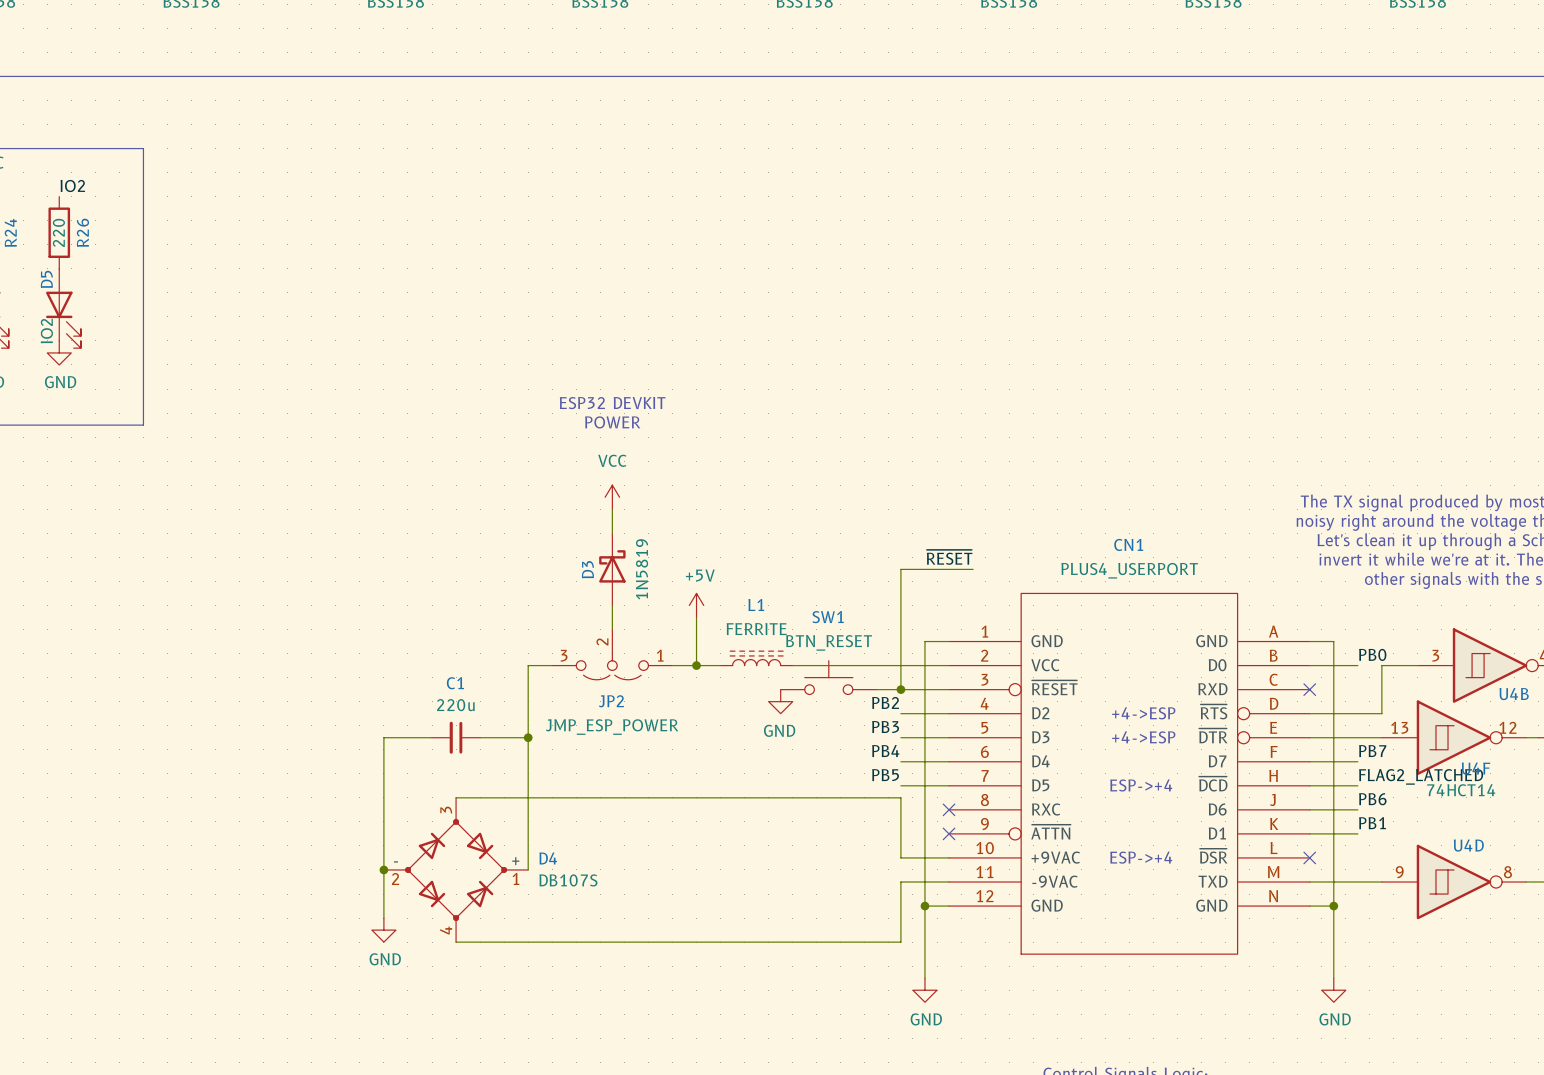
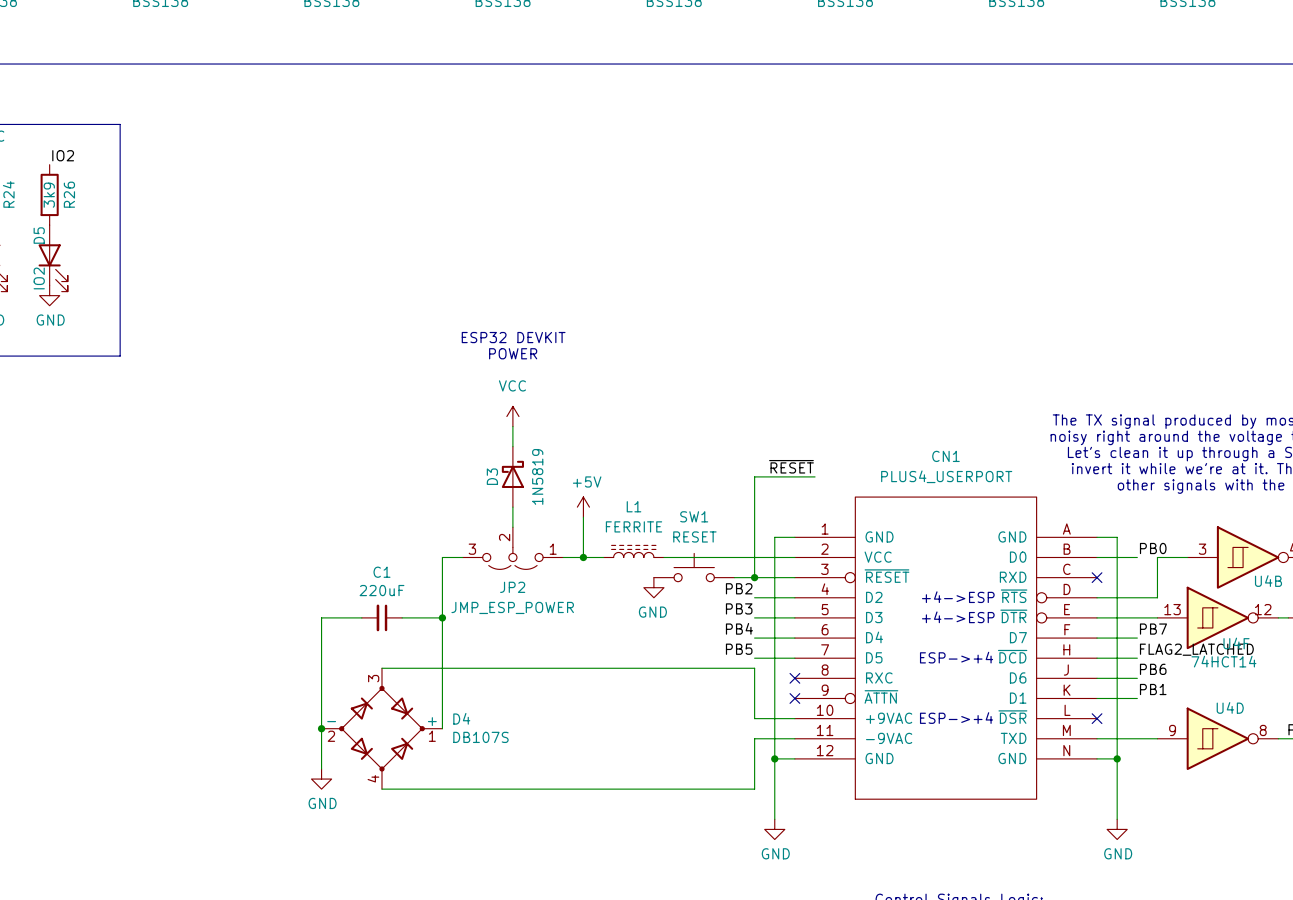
R26 value: 220 (58, 232) -> 3k9 (49, 195)
SW1 value: BTN_RESET (829, 642) -> RESET (694, 536)
C1 value: 220u (455, 705) -> 220uF (381, 590)

